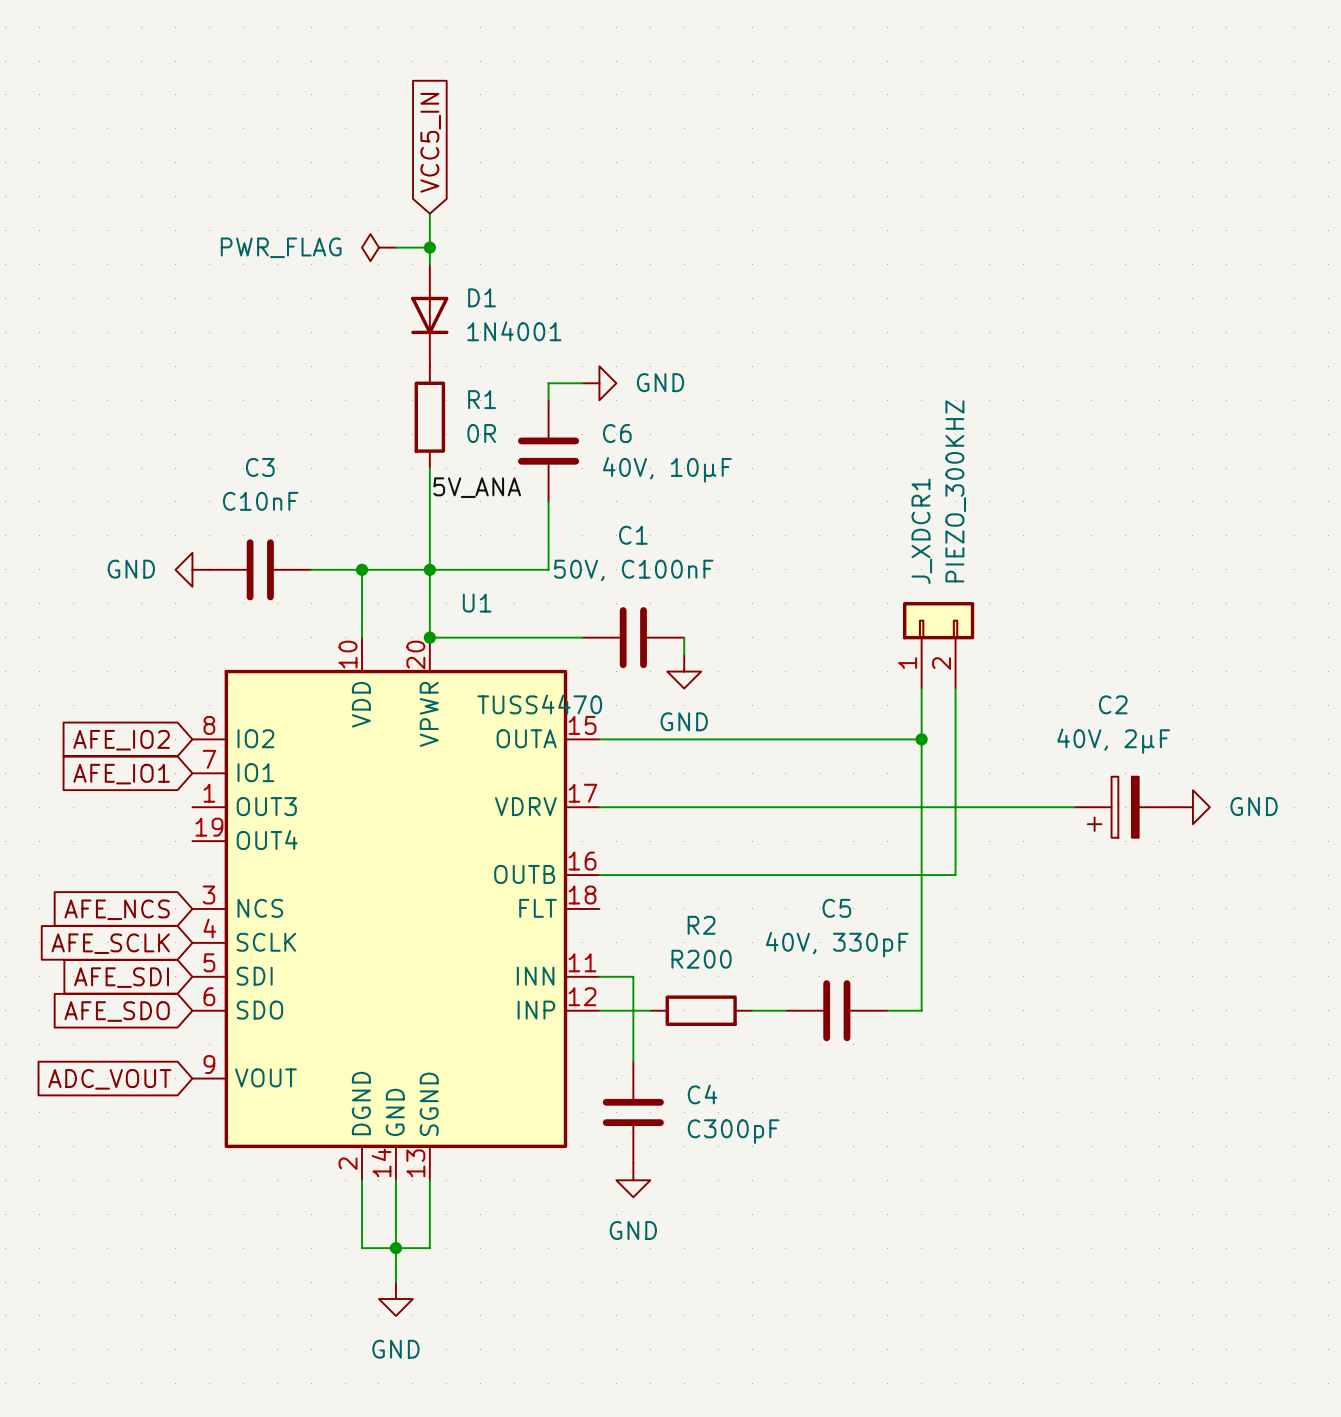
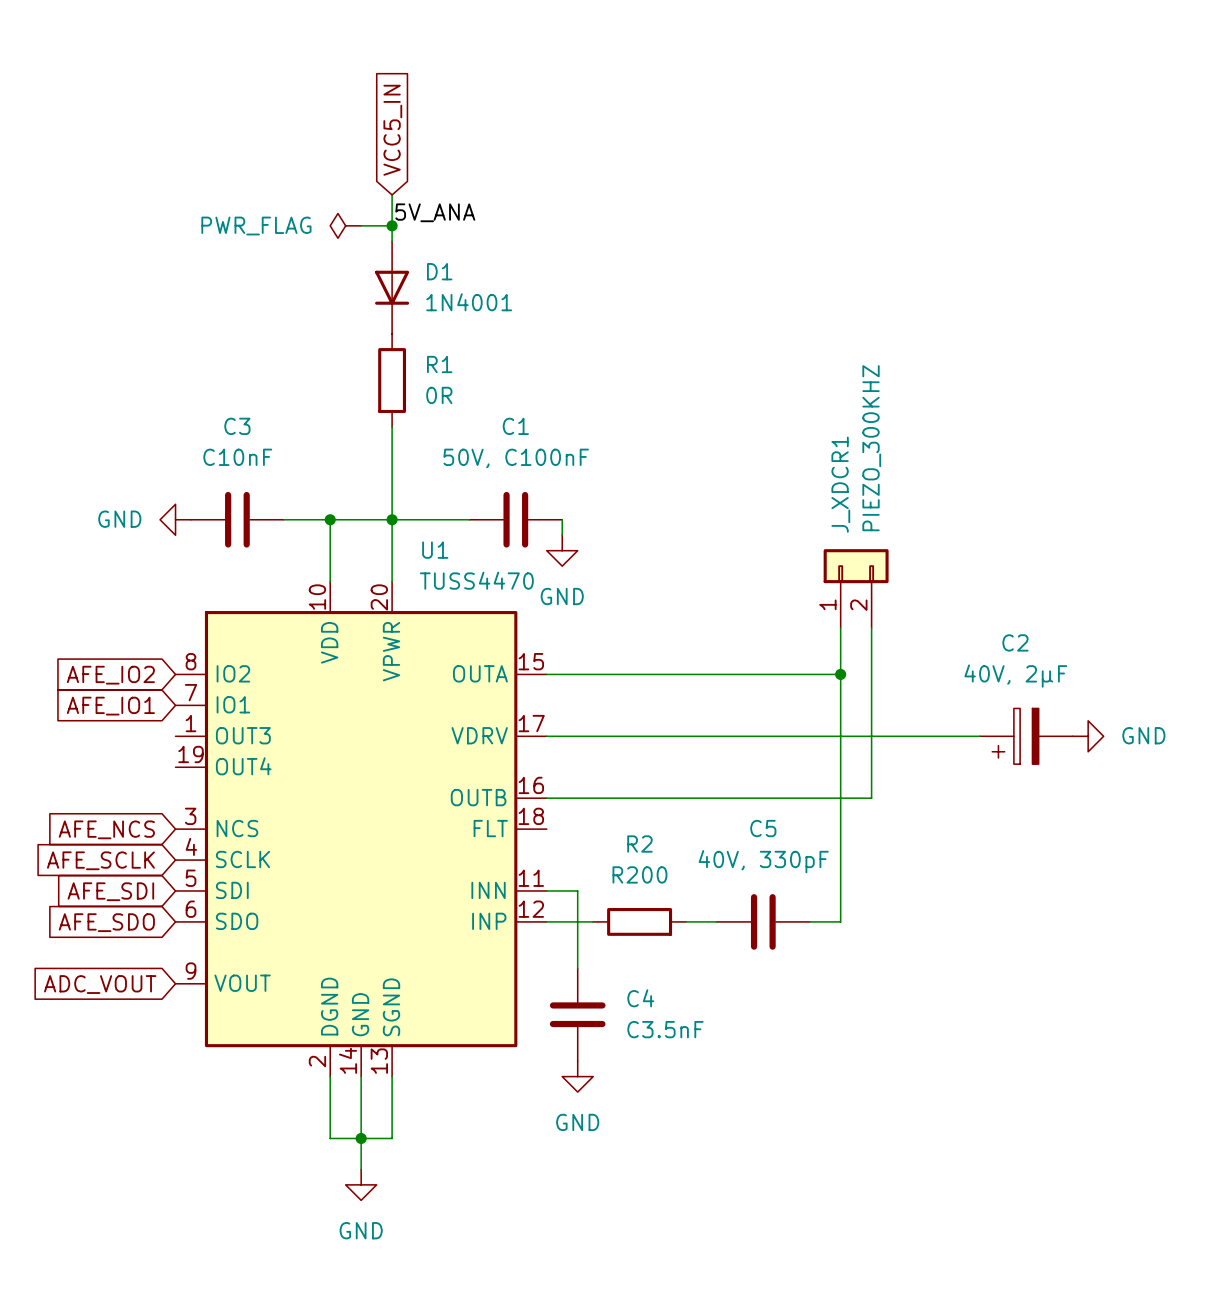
wire: (582, 383) (548, 383) (548, 400) -> none
power symbol: GND (599, 383) -> none
C6: 40V, 10µF (548, 451) -> none
label position: 5V_ANA (477, 487) -> 5V_ANA (435, 212)
wire: (548, 501) (548, 569) (514, 569) -> none
wire: (429, 637) (582, 637) -> none
junction: (429, 637) -> none
C1 position: (633, 637) -> (515, 519)
wire: (684, 637) (684, 654) -> (562, 519) (562, 535)
power symbol position: GND (684, 671) -> GND (562, 550)
U1 value position: TUSS4470 (539, 704) -> TUSS4470 (476, 580)
C4 value: C300pF (733, 1131) -> C3.5nF (665, 1029)

